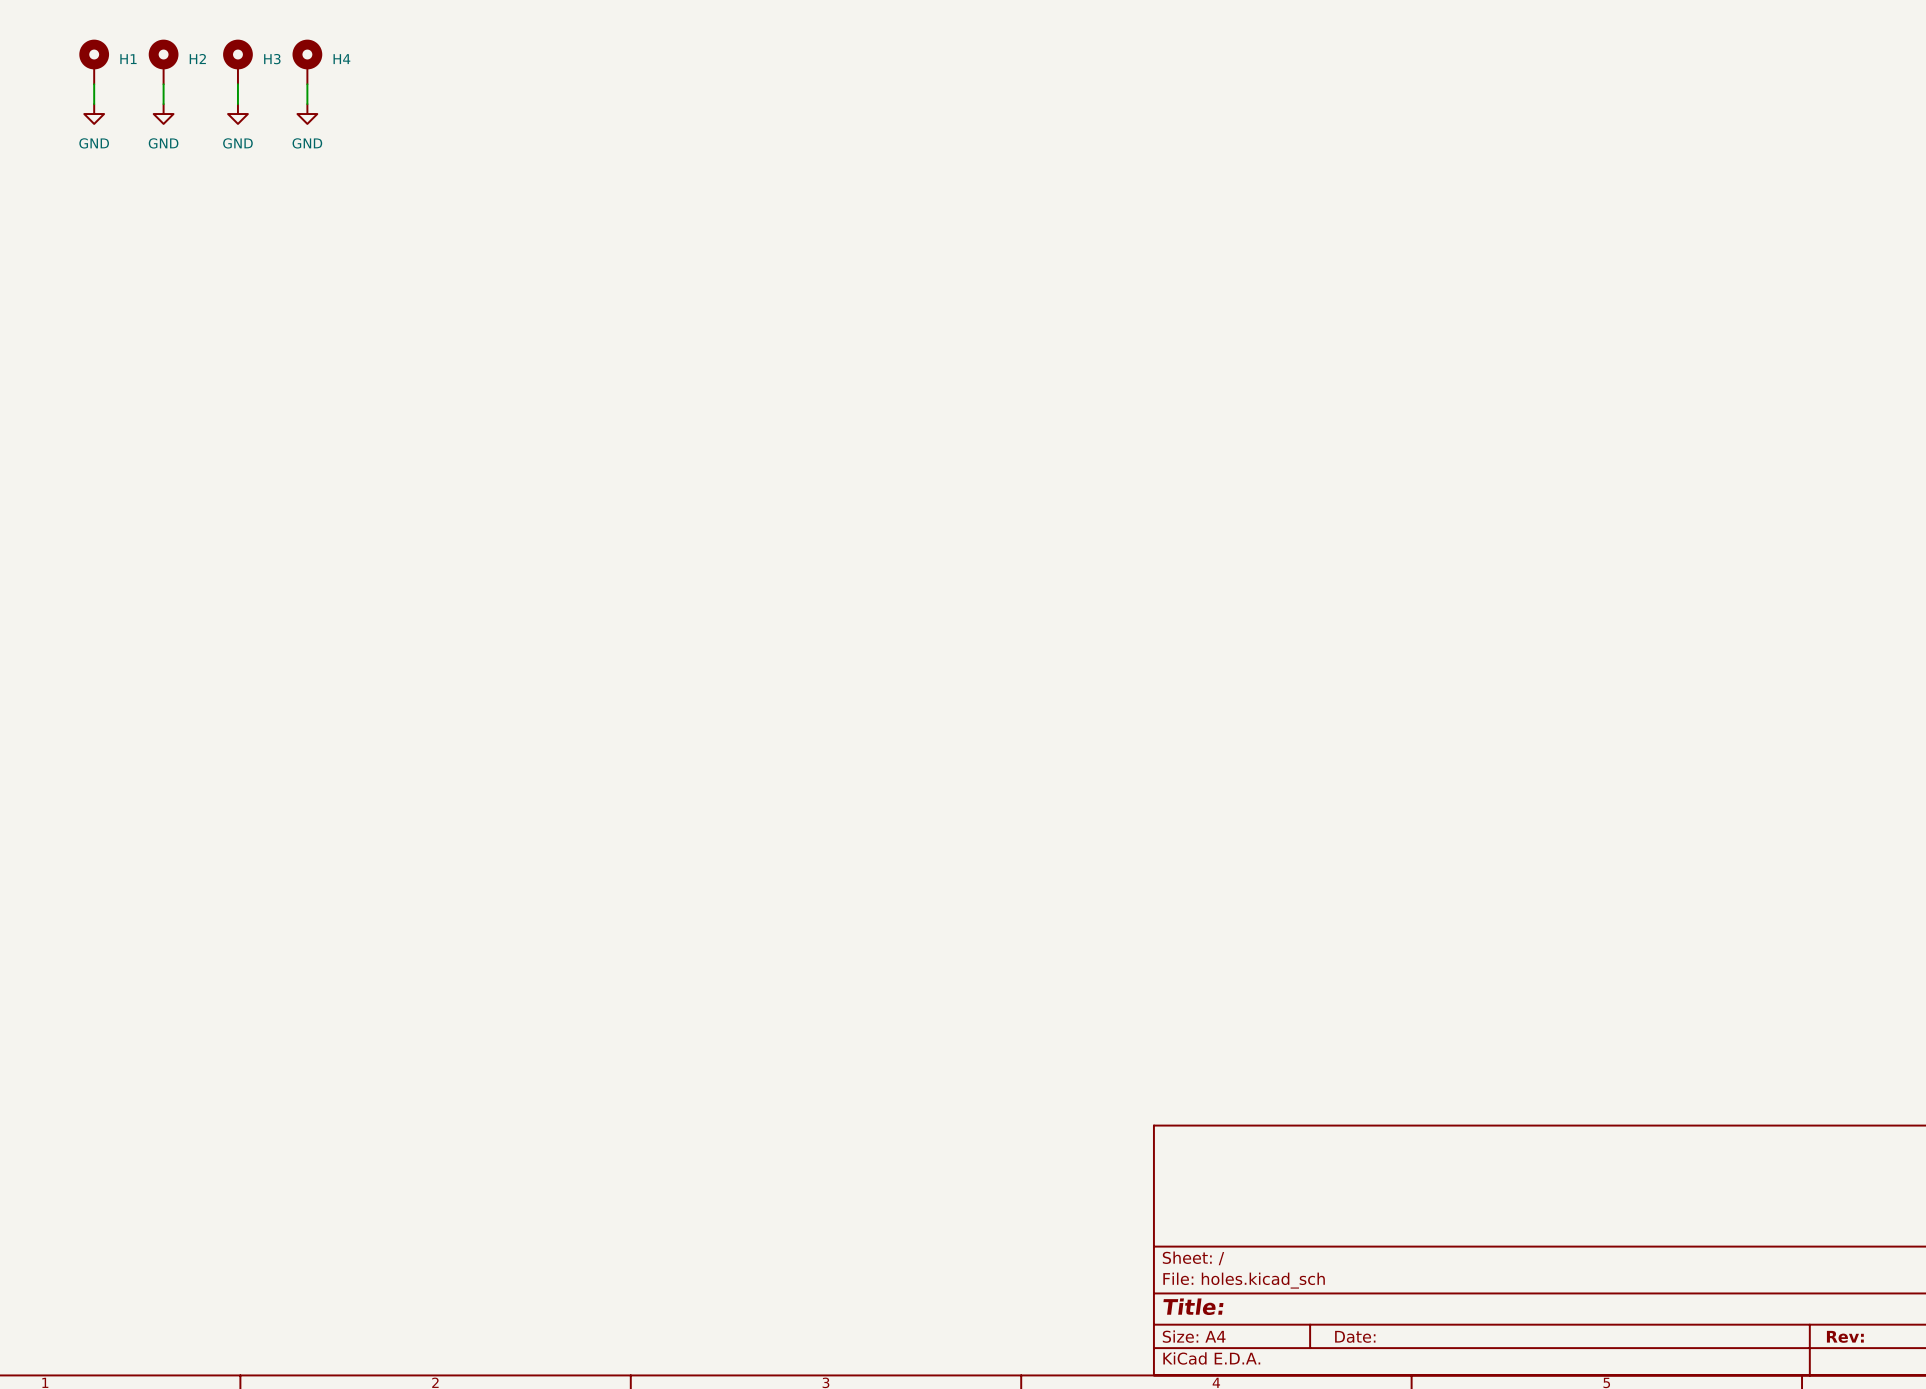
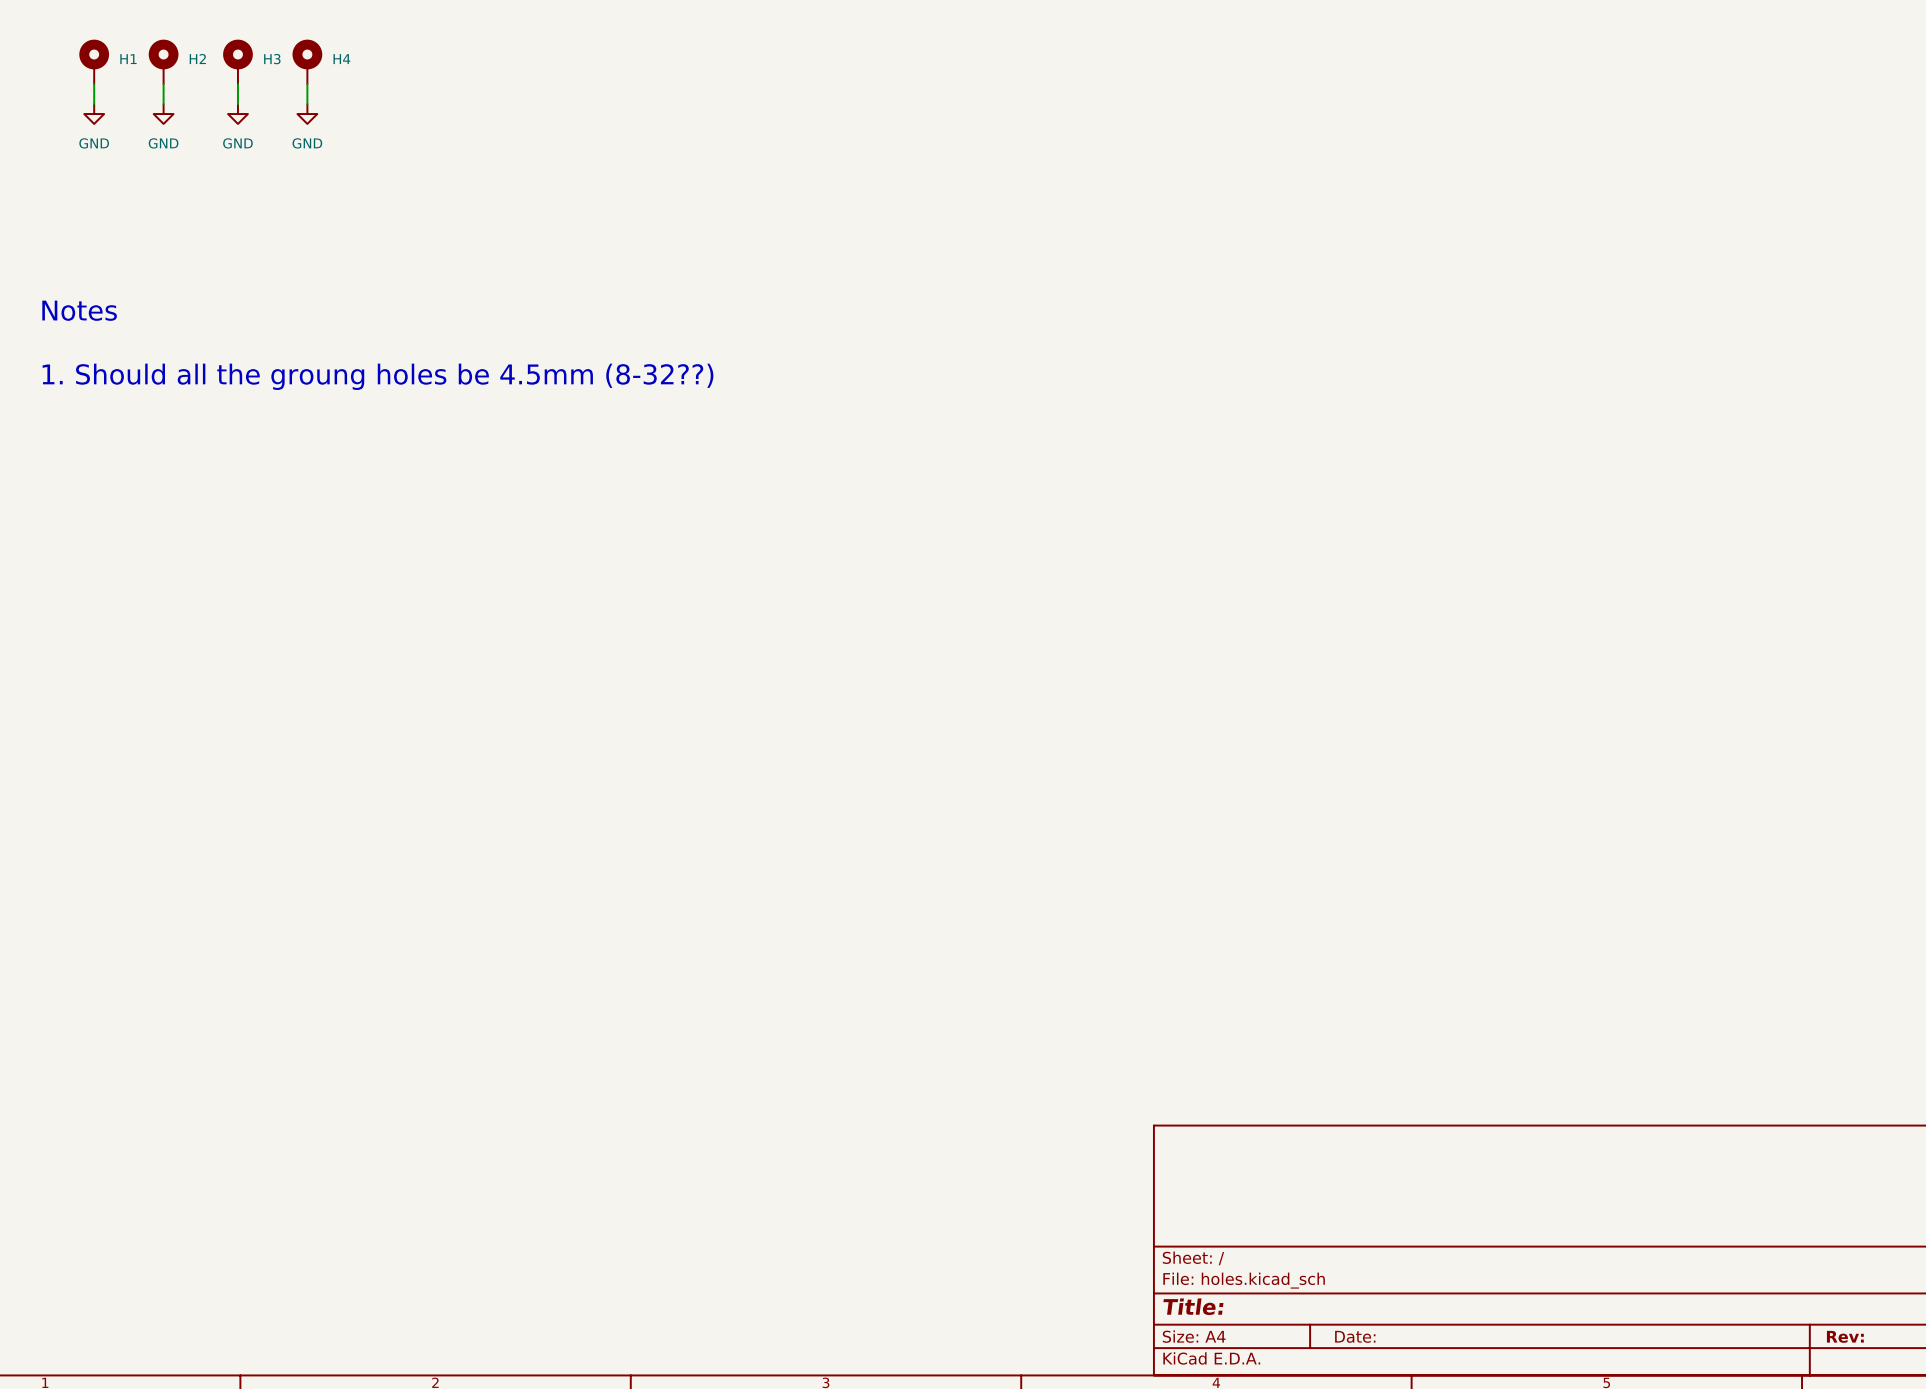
text: none -> Notes (79, 310)
text: none -> 1. Should all the groung holes be 4.5mm (8-32??) (378, 376)

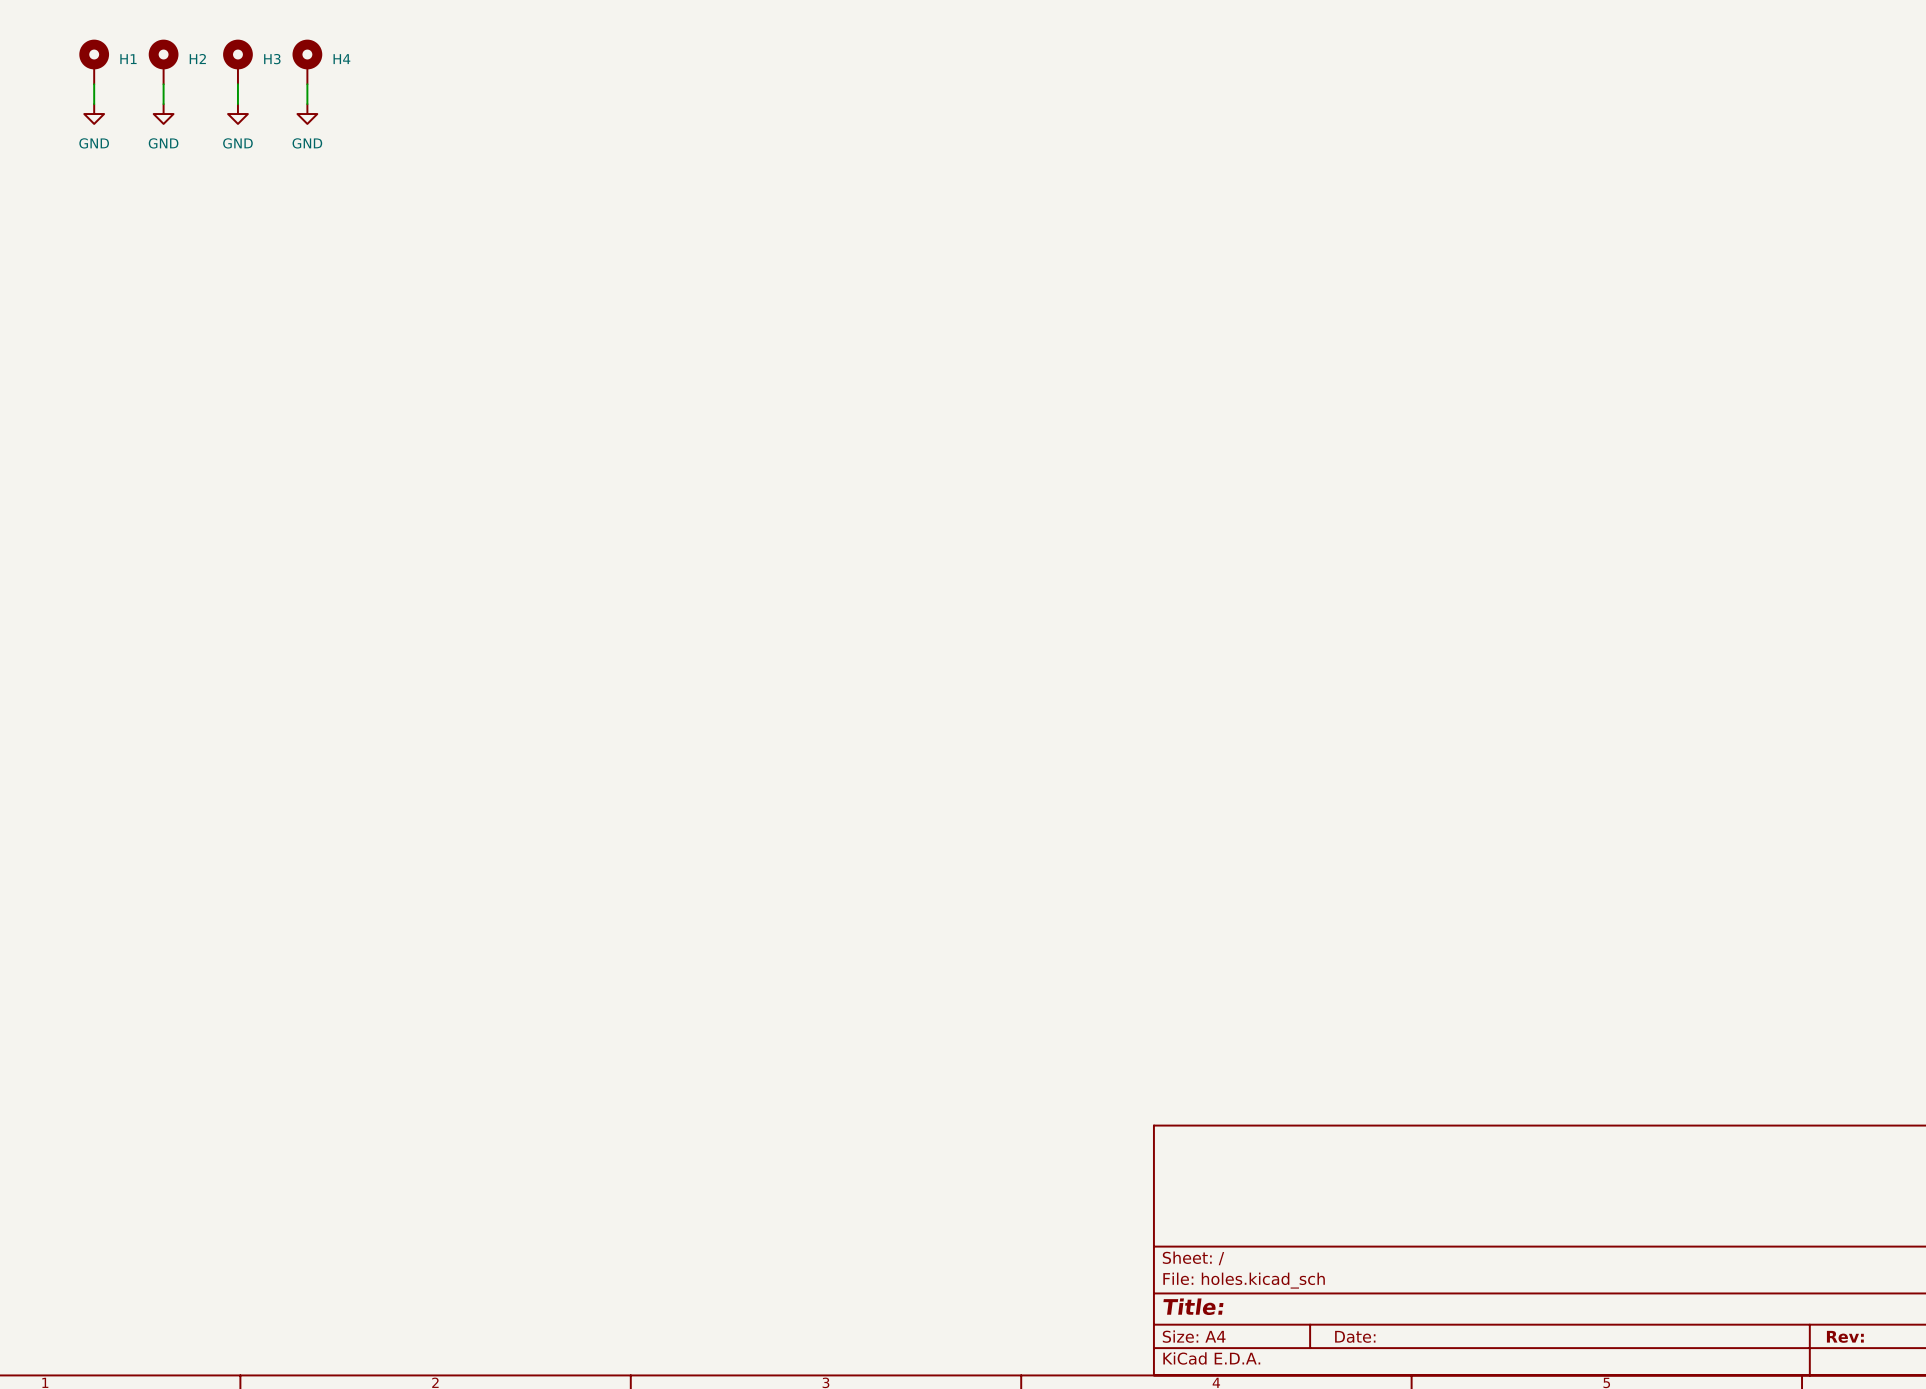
text: Notes (79, 310) -> none
text: 1. Should all the groung holes be 4.5mm (8-32??) (378, 376) -> none

